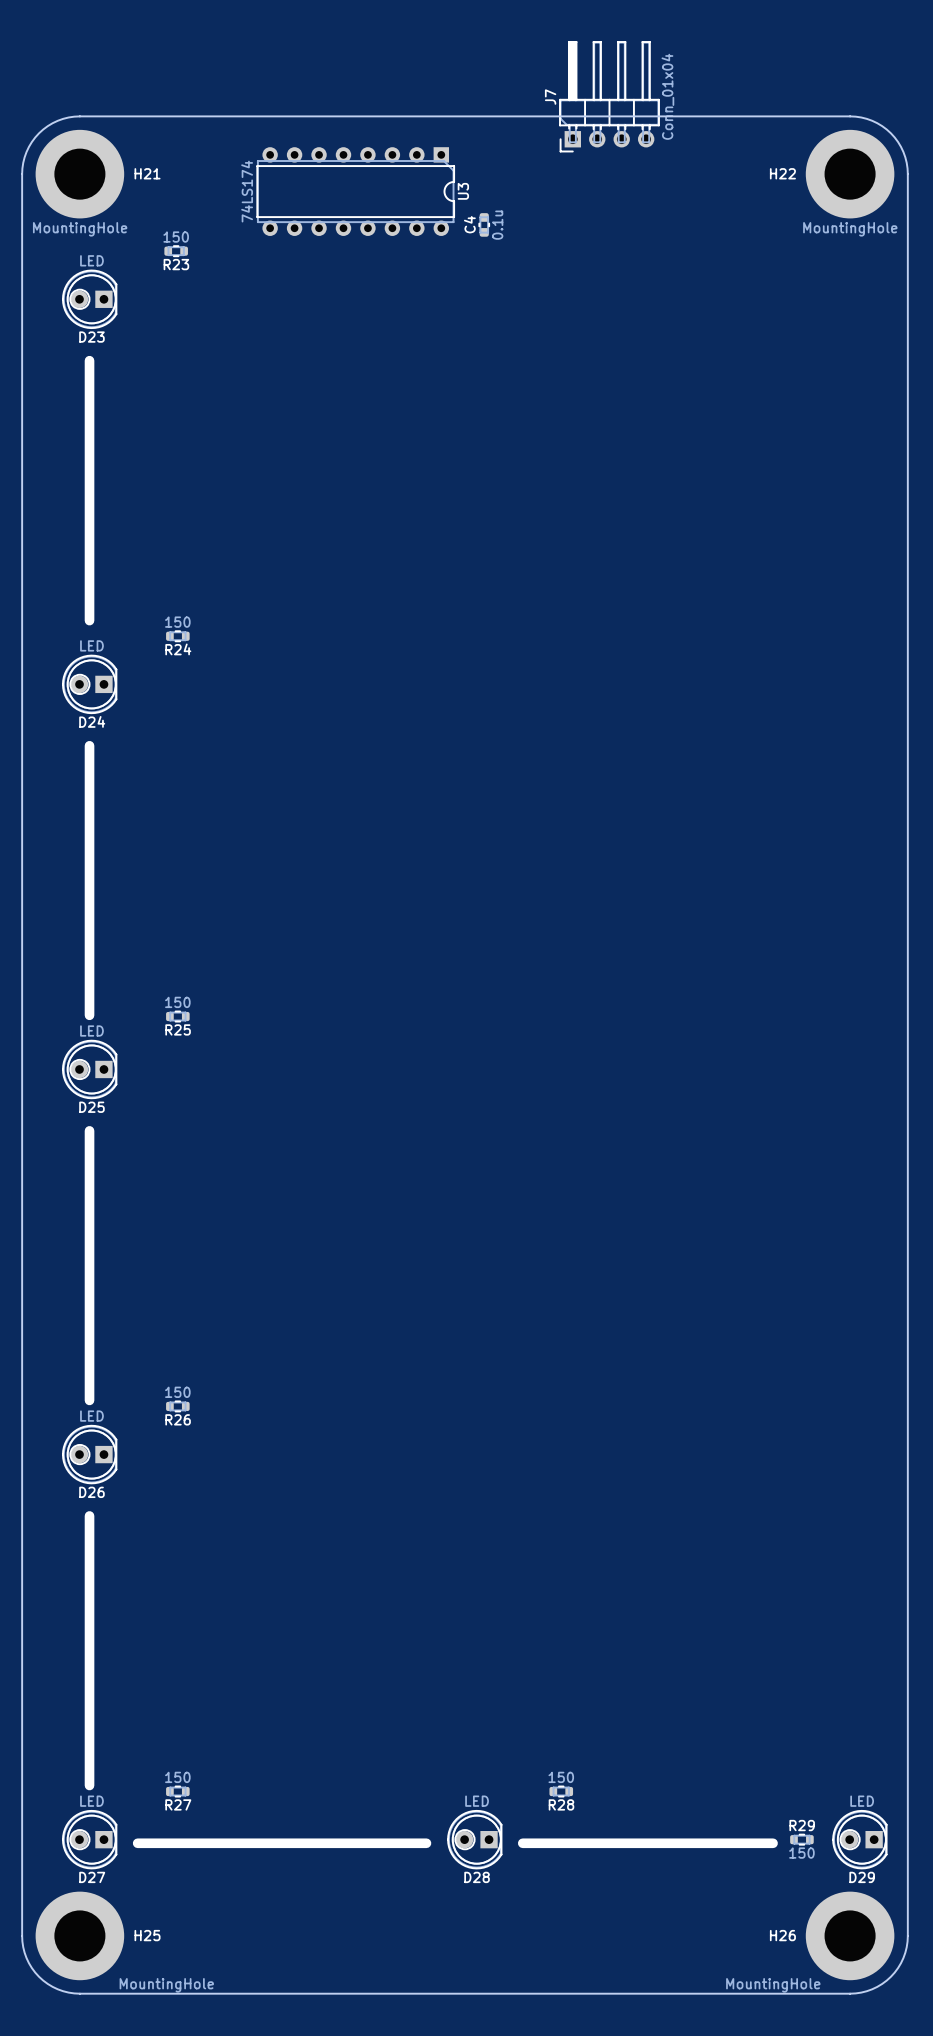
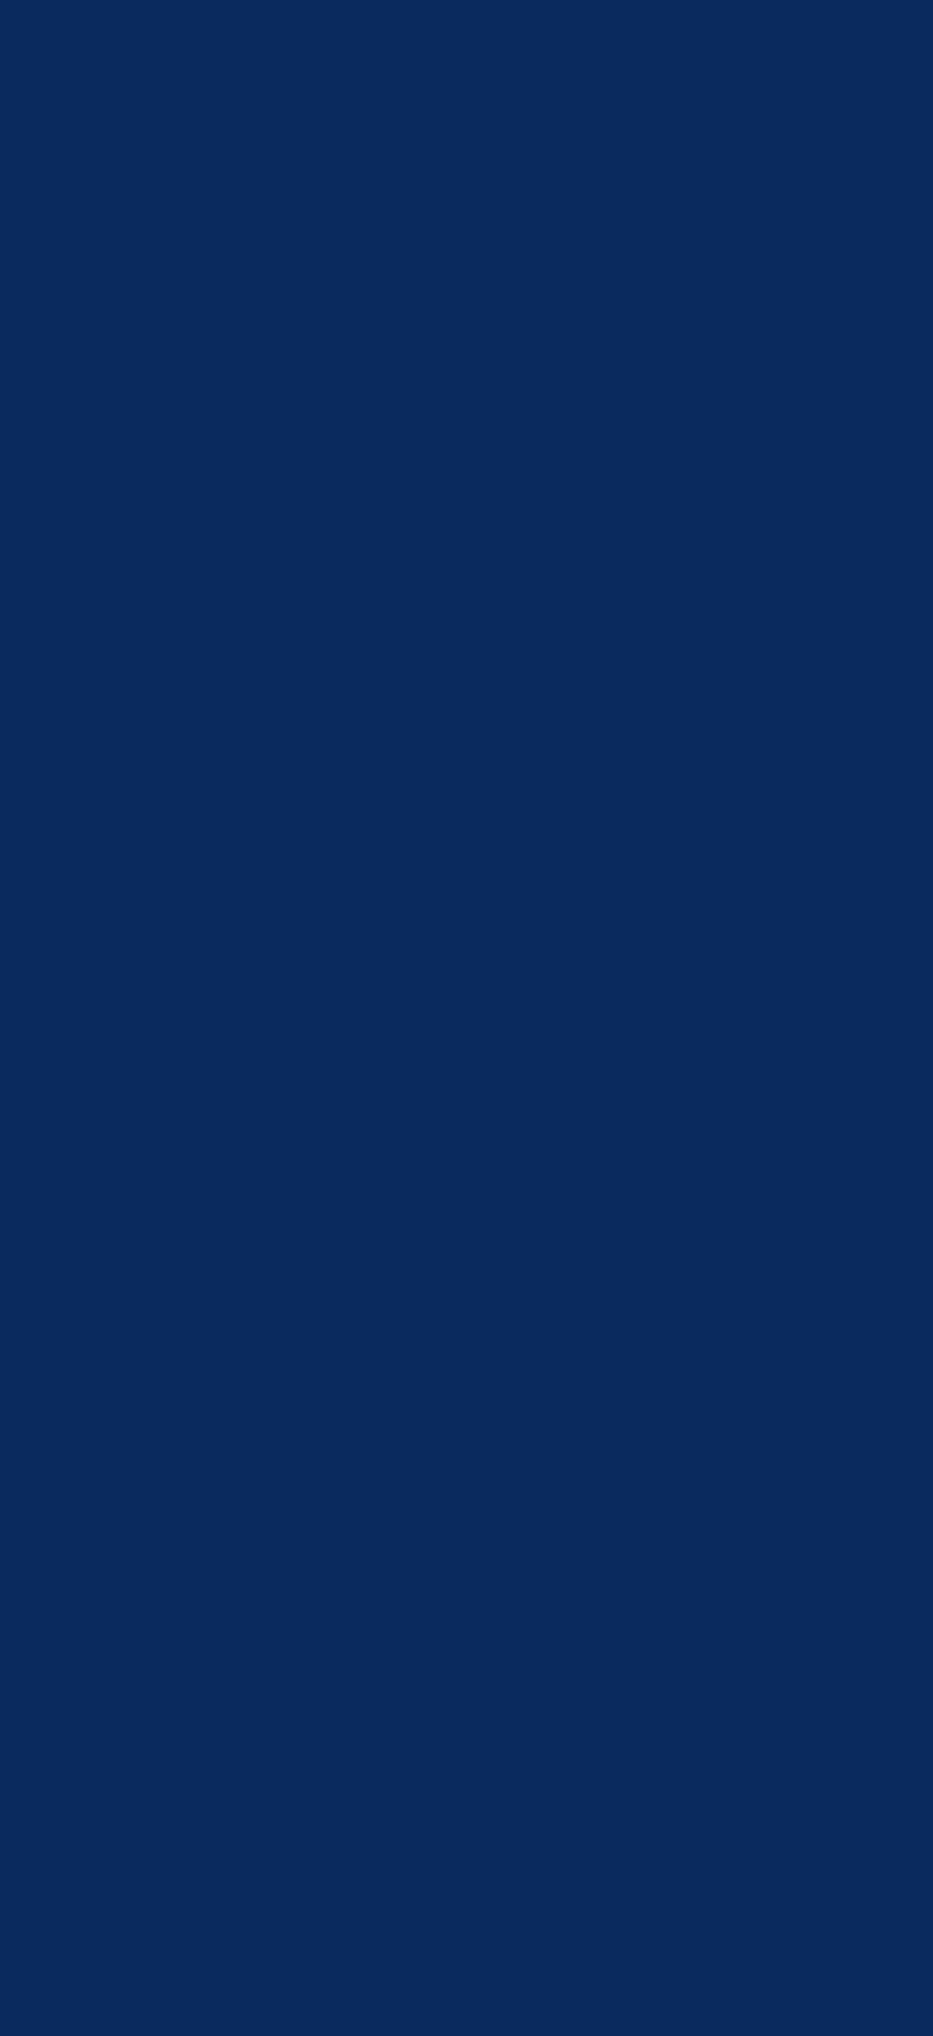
J7: Conn_01x04 (609, 96) -> none
board edge: (79, 116) (850, 116) (866, 118) (882, 126) (894, 137) (903, 152) (907, 174) (907, 1935) (905, 1952) (898, 1968) (886, 1980) (872, 1989) (850, 1993) (79, 1993) (63, 1991) (47, 1983) (35, 1972) (26, 1958) (22, 1935) (22, 174) (26, 152) (39, 133) (57, 120) (79, 116) -> none
H21: MountingHole (79, 174) -> none
H22: MountingHole (850, 174) -> none
U3: 74LS174 (355, 191) -> none
C4: 0.1u (484, 224) -> none
R23: 150 (176, 251) -> none
drawing: [69, 289, 91, 310] -> none
D23: LED (89, 299) -> none
line: (89, 360) (89, 620) -> none
R24: 150 (177, 636) -> none
drawing: [69, 674, 91, 695] -> none
D24: LED (89, 684) -> none
line: (89, 745) (89, 1015) -> none
R25: 150 (177, 1016) -> none
drawing: [69, 1059, 91, 1080] -> none
D25: LED (89, 1069) -> none
line: (89, 1130) (89, 1400) -> none
R26: 150 (177, 1406) -> none
drawing: [69, 1444, 91, 1465] -> none
D26: LED (89, 1454) -> none
line: (89, 1515) (89, 1785) -> none
R27: 150 (177, 1791) -> none
R28: 150 (561, 1791) -> none
drawing: [69, 1829, 91, 1850] -> none
drawing: [454, 1829, 476, 1850] -> none
drawing: [839, 1829, 861, 1850] -> none
D27: LED (89, 1839) -> none
D28: LED (474, 1839) -> none
R29: 150 (801, 1839) -> none
D29: LED (859, 1839) -> none
line: (137, 1843) (426, 1843) -> none
line: (522, 1843) (773, 1843) -> none
H25: MountingHole (79, 1935) -> none
H26: MountingHole (850, 1935) -> none

